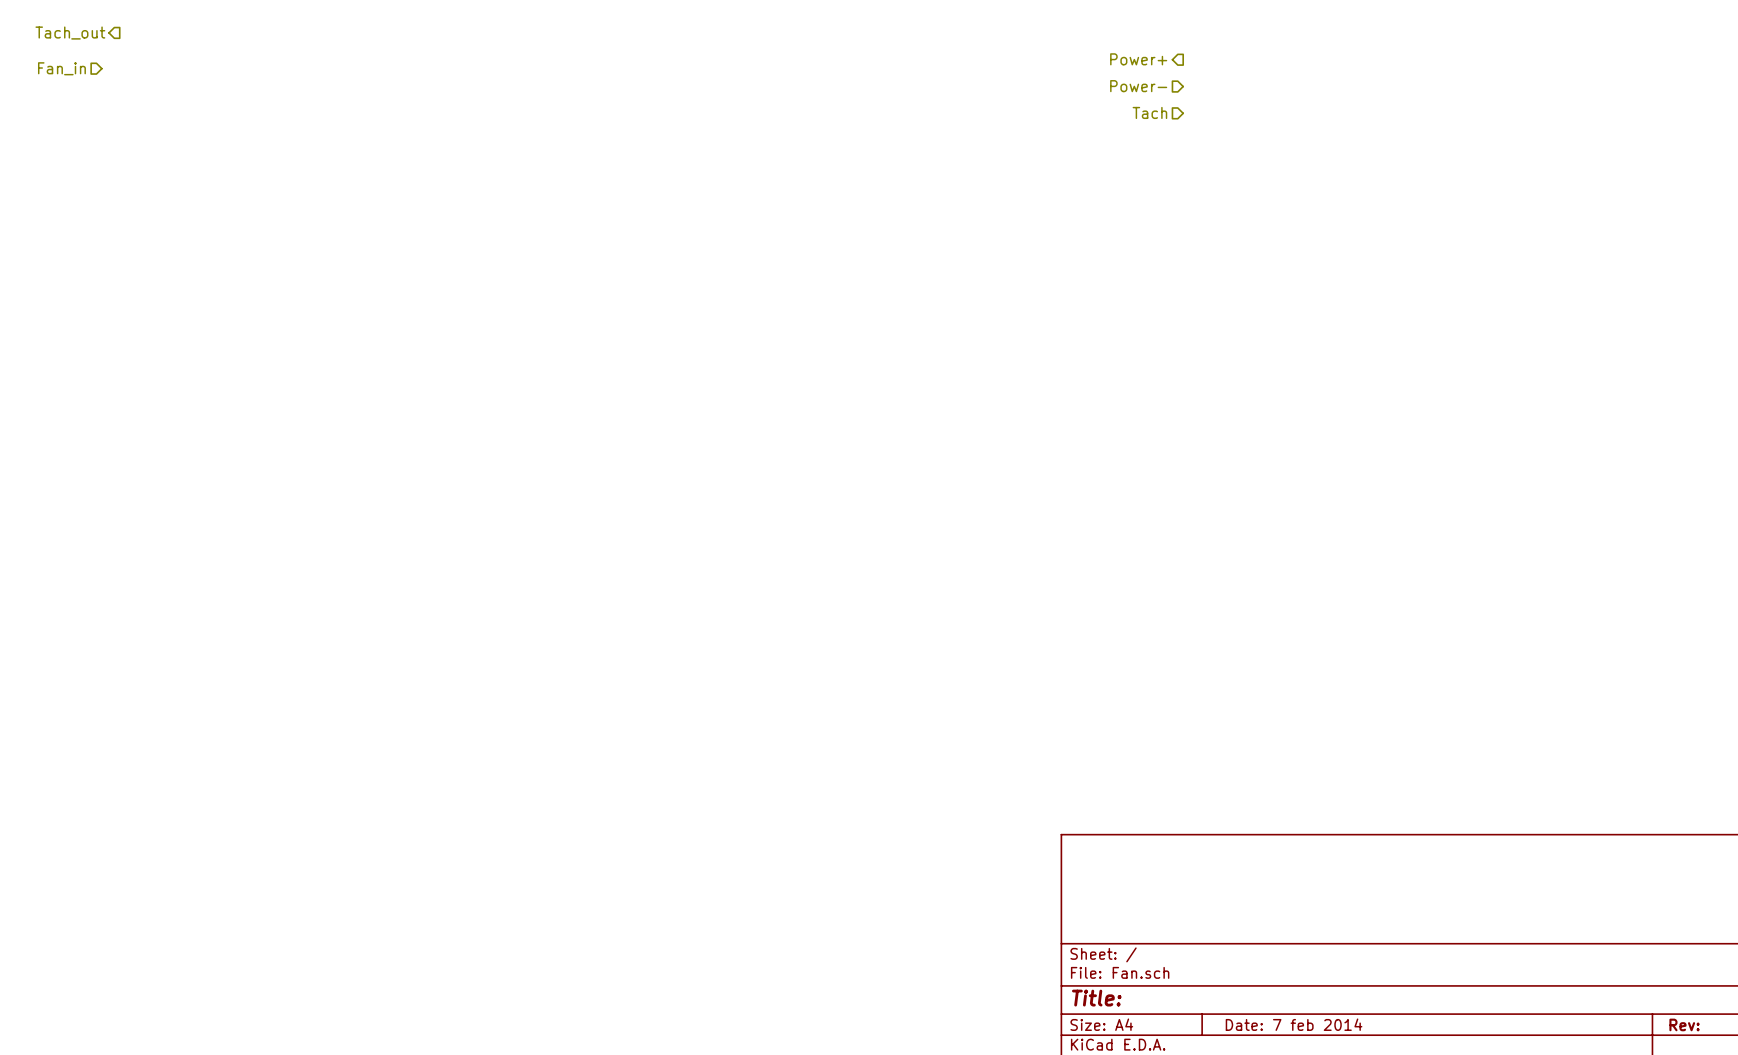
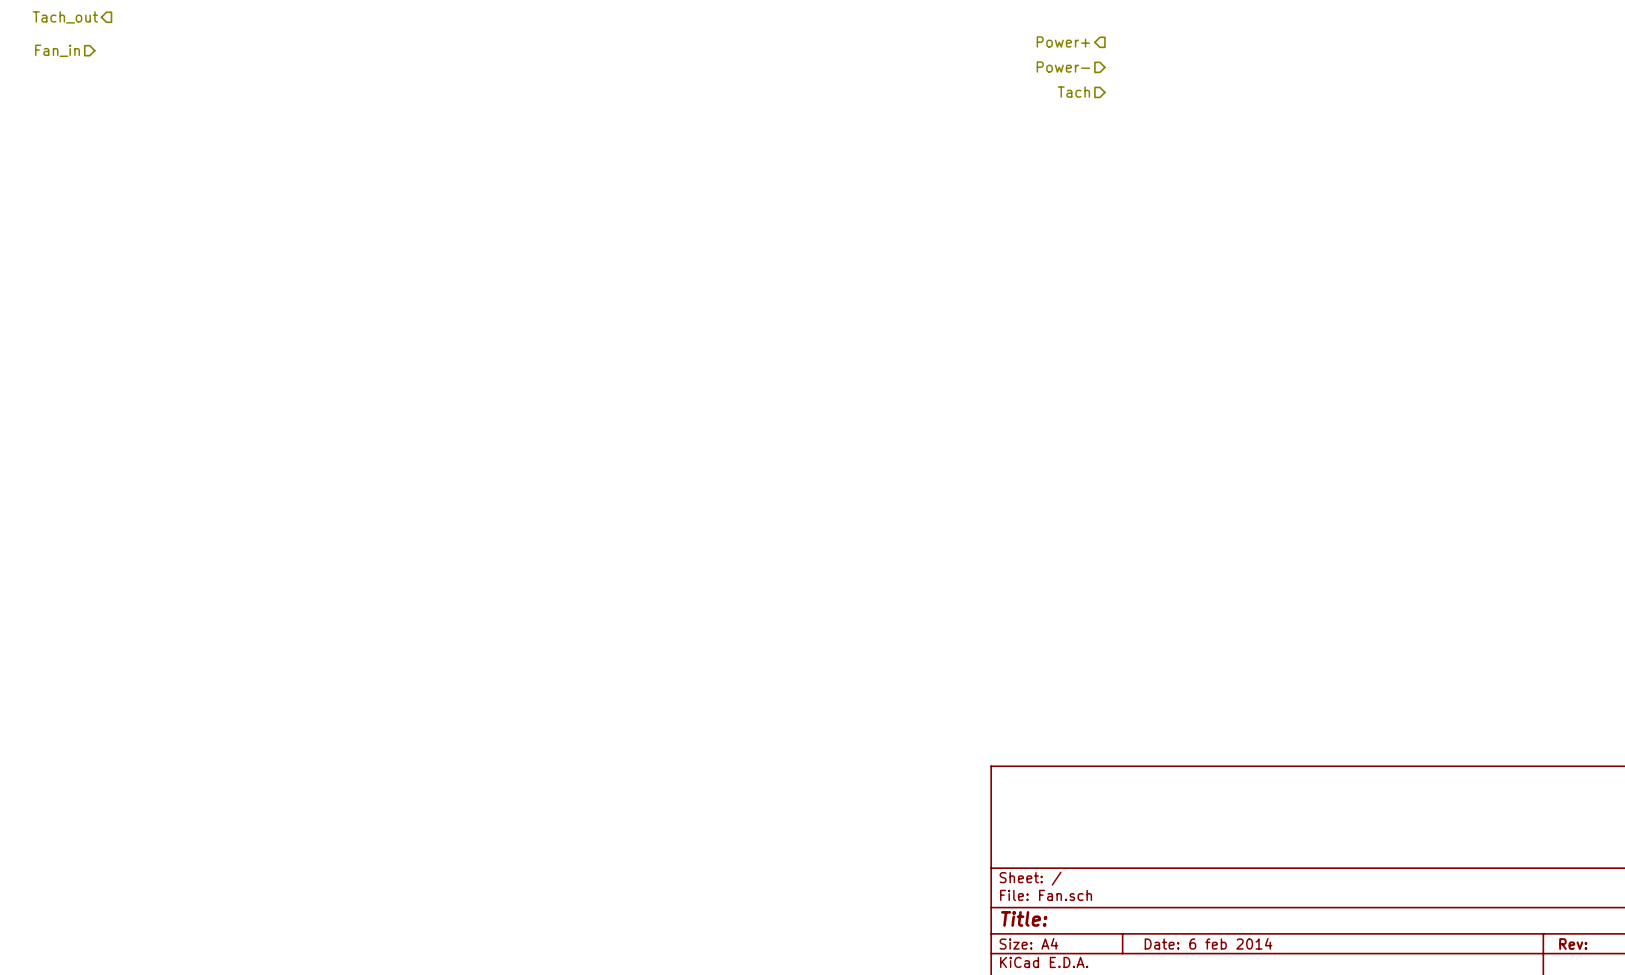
title block: Date: 7 feb 2014 (1294, 1024) -> Date: 6 feb 2014 (1208, 943)

